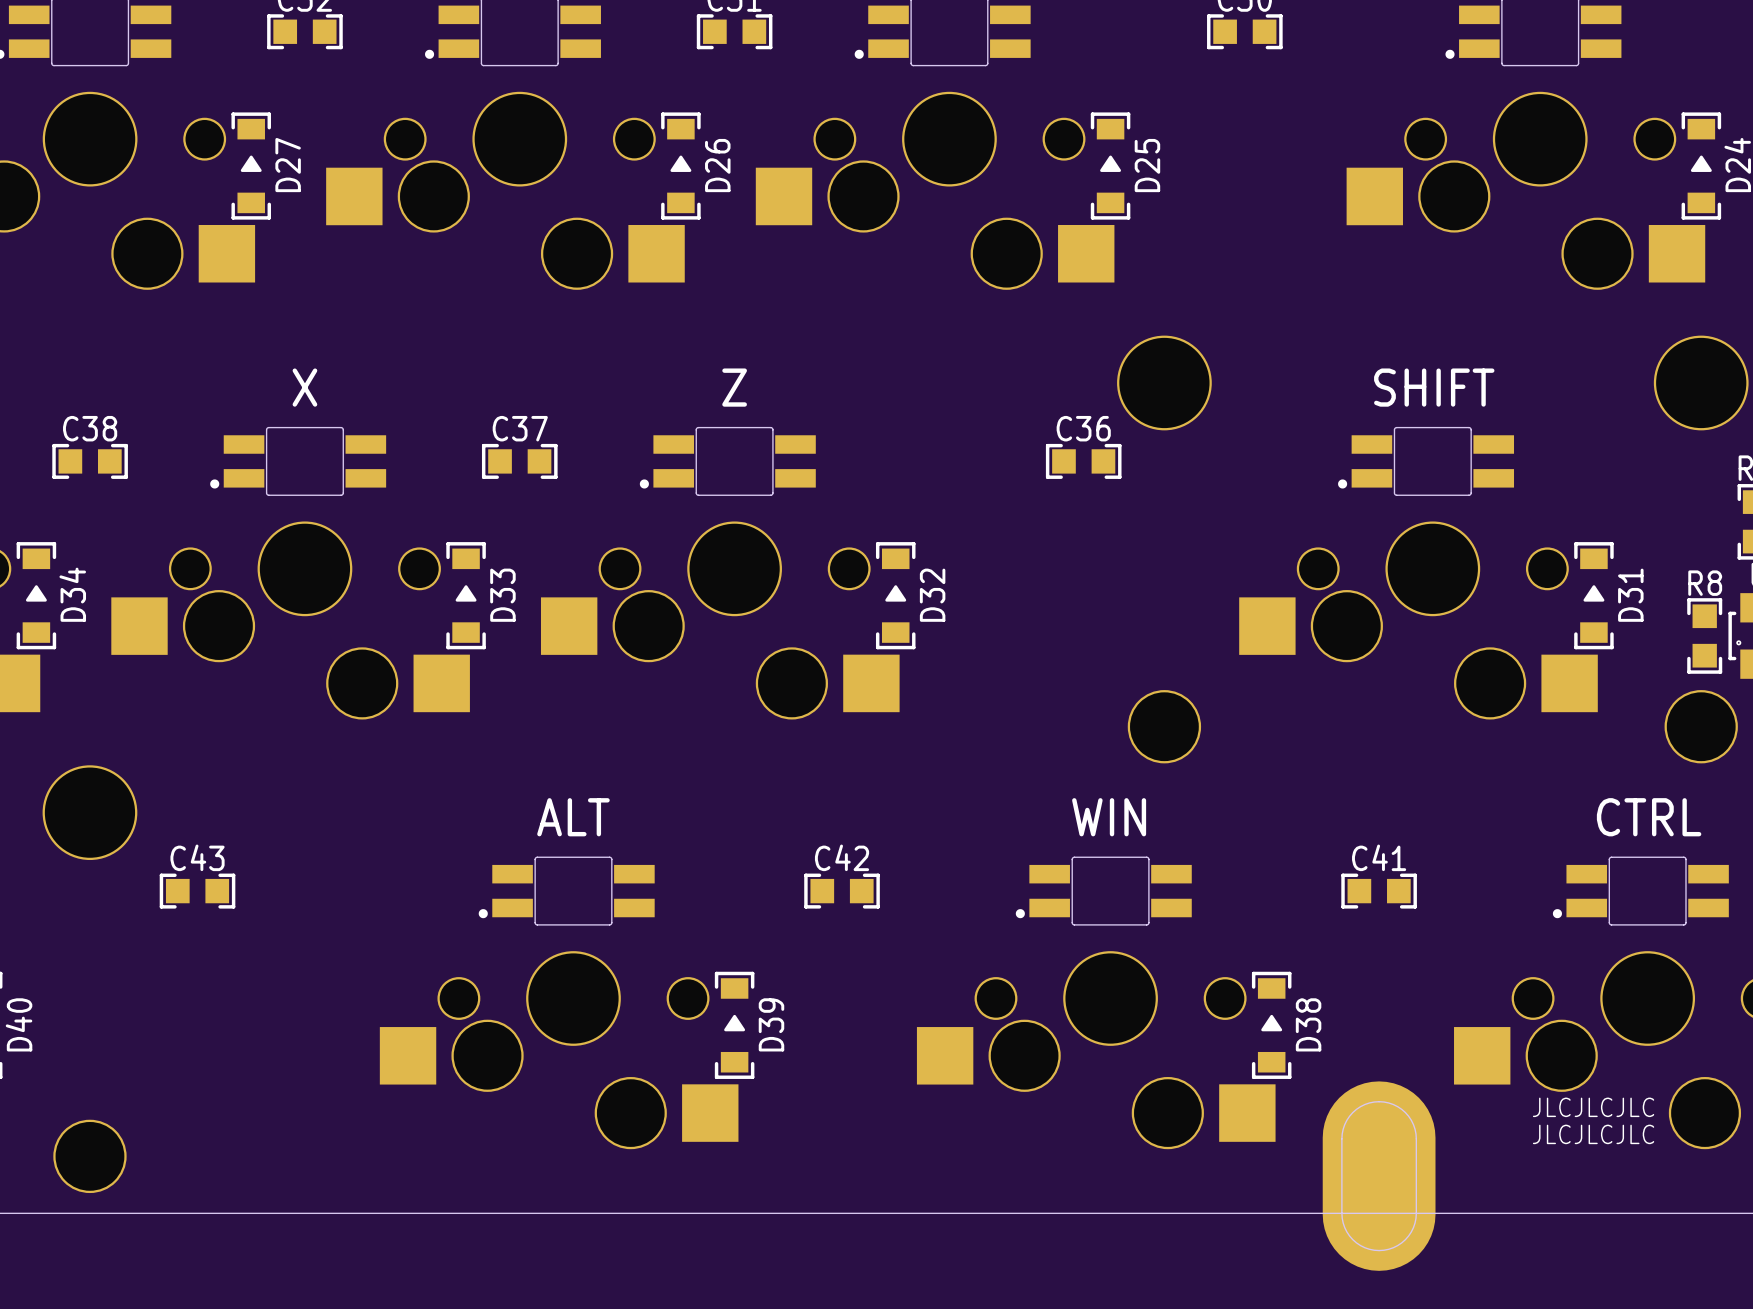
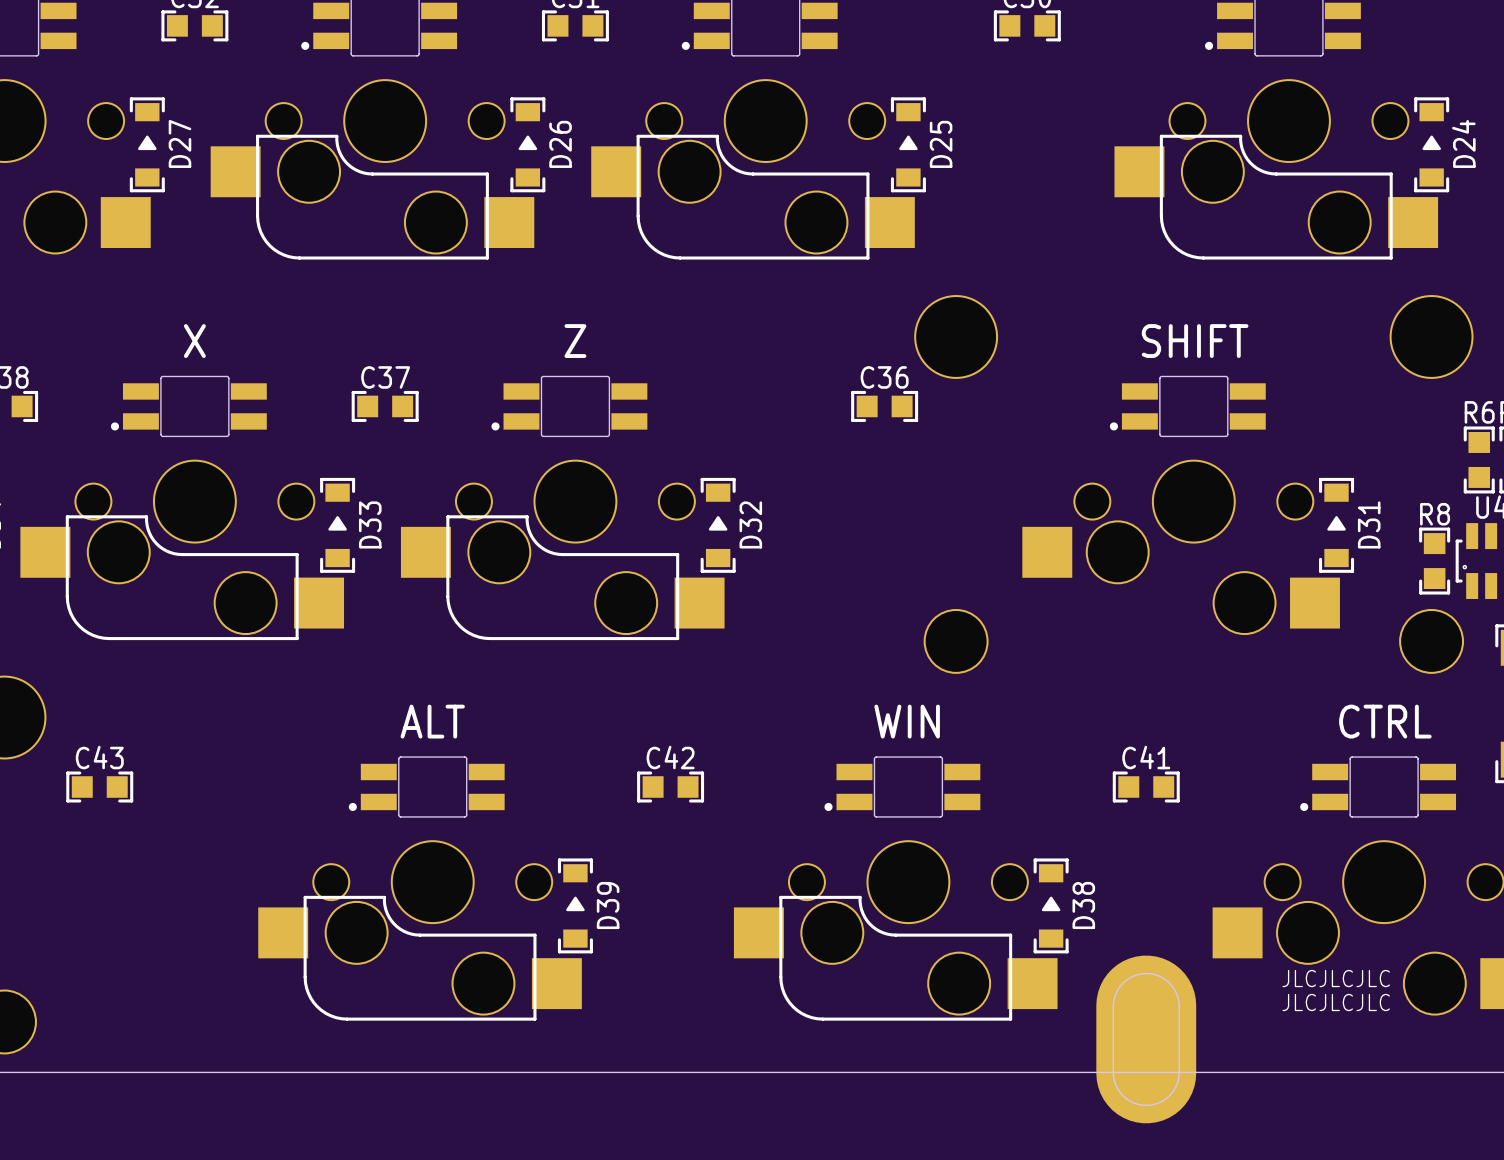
part footprint: [326, 91, 685, 290] -> [210, 79, 535, 260]
part footprint: [755, 91, 1115, 290] -> [591, 79, 915, 260]
part footprint: [1346, 91, 1706, 290] -> [1114, 79, 1439, 260]
part footprint: [111, 521, 470, 720] -> [20, 459, 345, 641]
part footprint: [540, 521, 900, 720] -> [400, 459, 725, 641]
part footprint: [379, 951, 739, 1150] -> [258, 840, 582, 1021]
part footprint: [916, 951, 1276, 1150] -> [733, 840, 1058, 1021]

